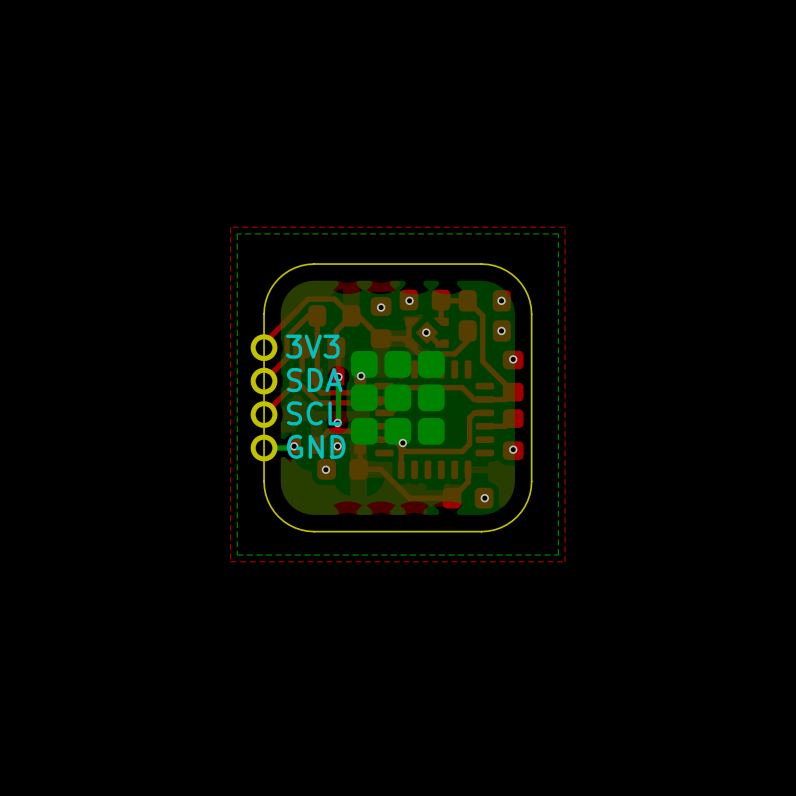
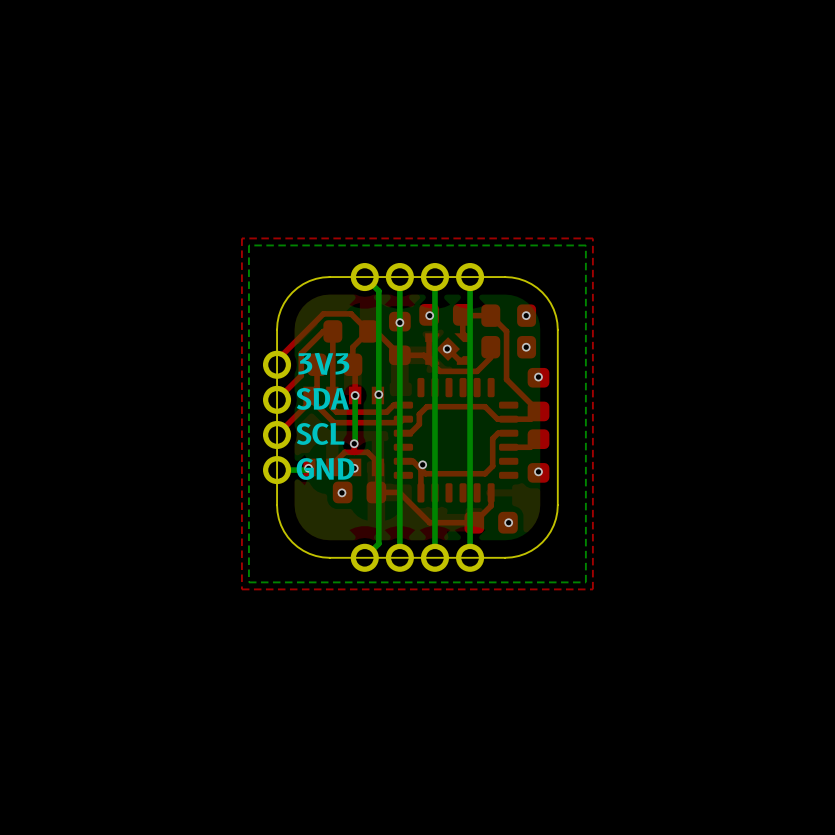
bottom track: none -> (364, 277) (378, 291) (378, 543) (364, 557)
bottom track: none -> (399, 277) (399, 557)
part: none -> (417, 277)
bottom track: none -> (434, 277) (434, 557)
bottom track: none -> (470, 277) (470, 557)
part: (397, 397) -> none
part: none -> (417, 557)

